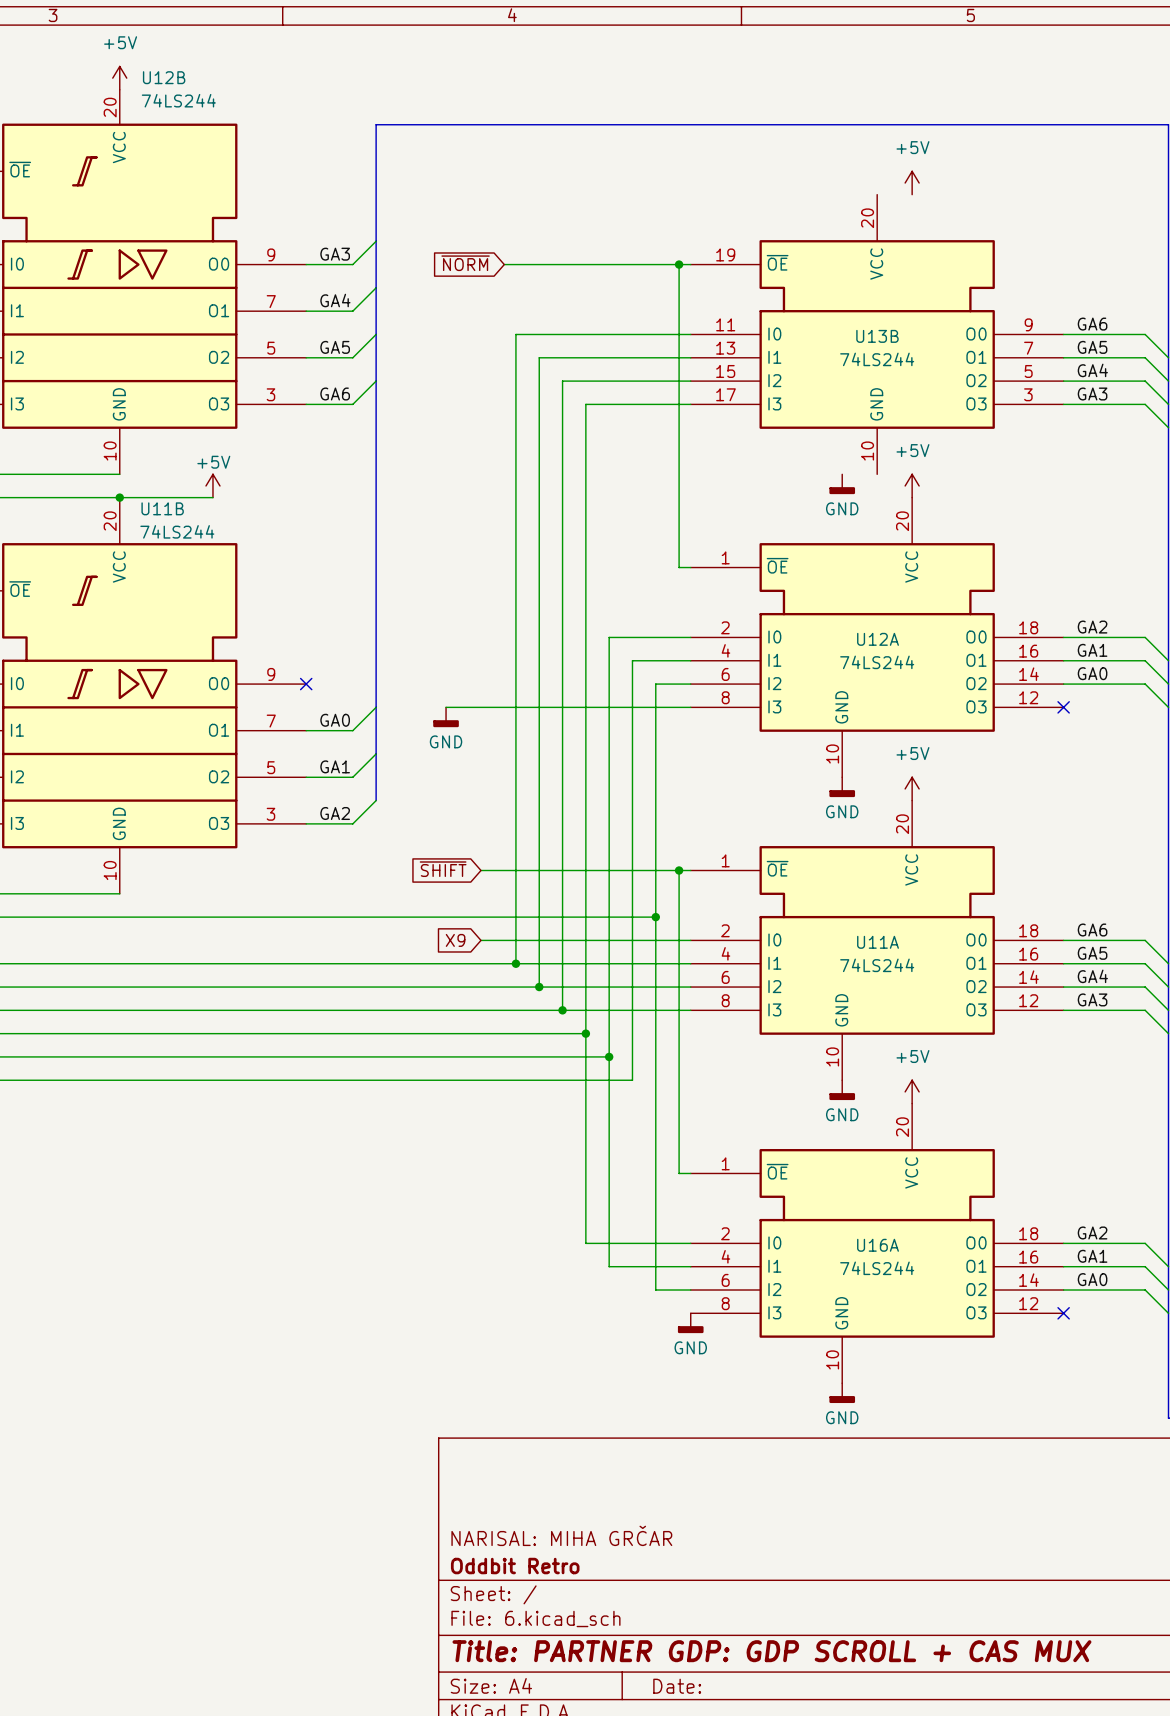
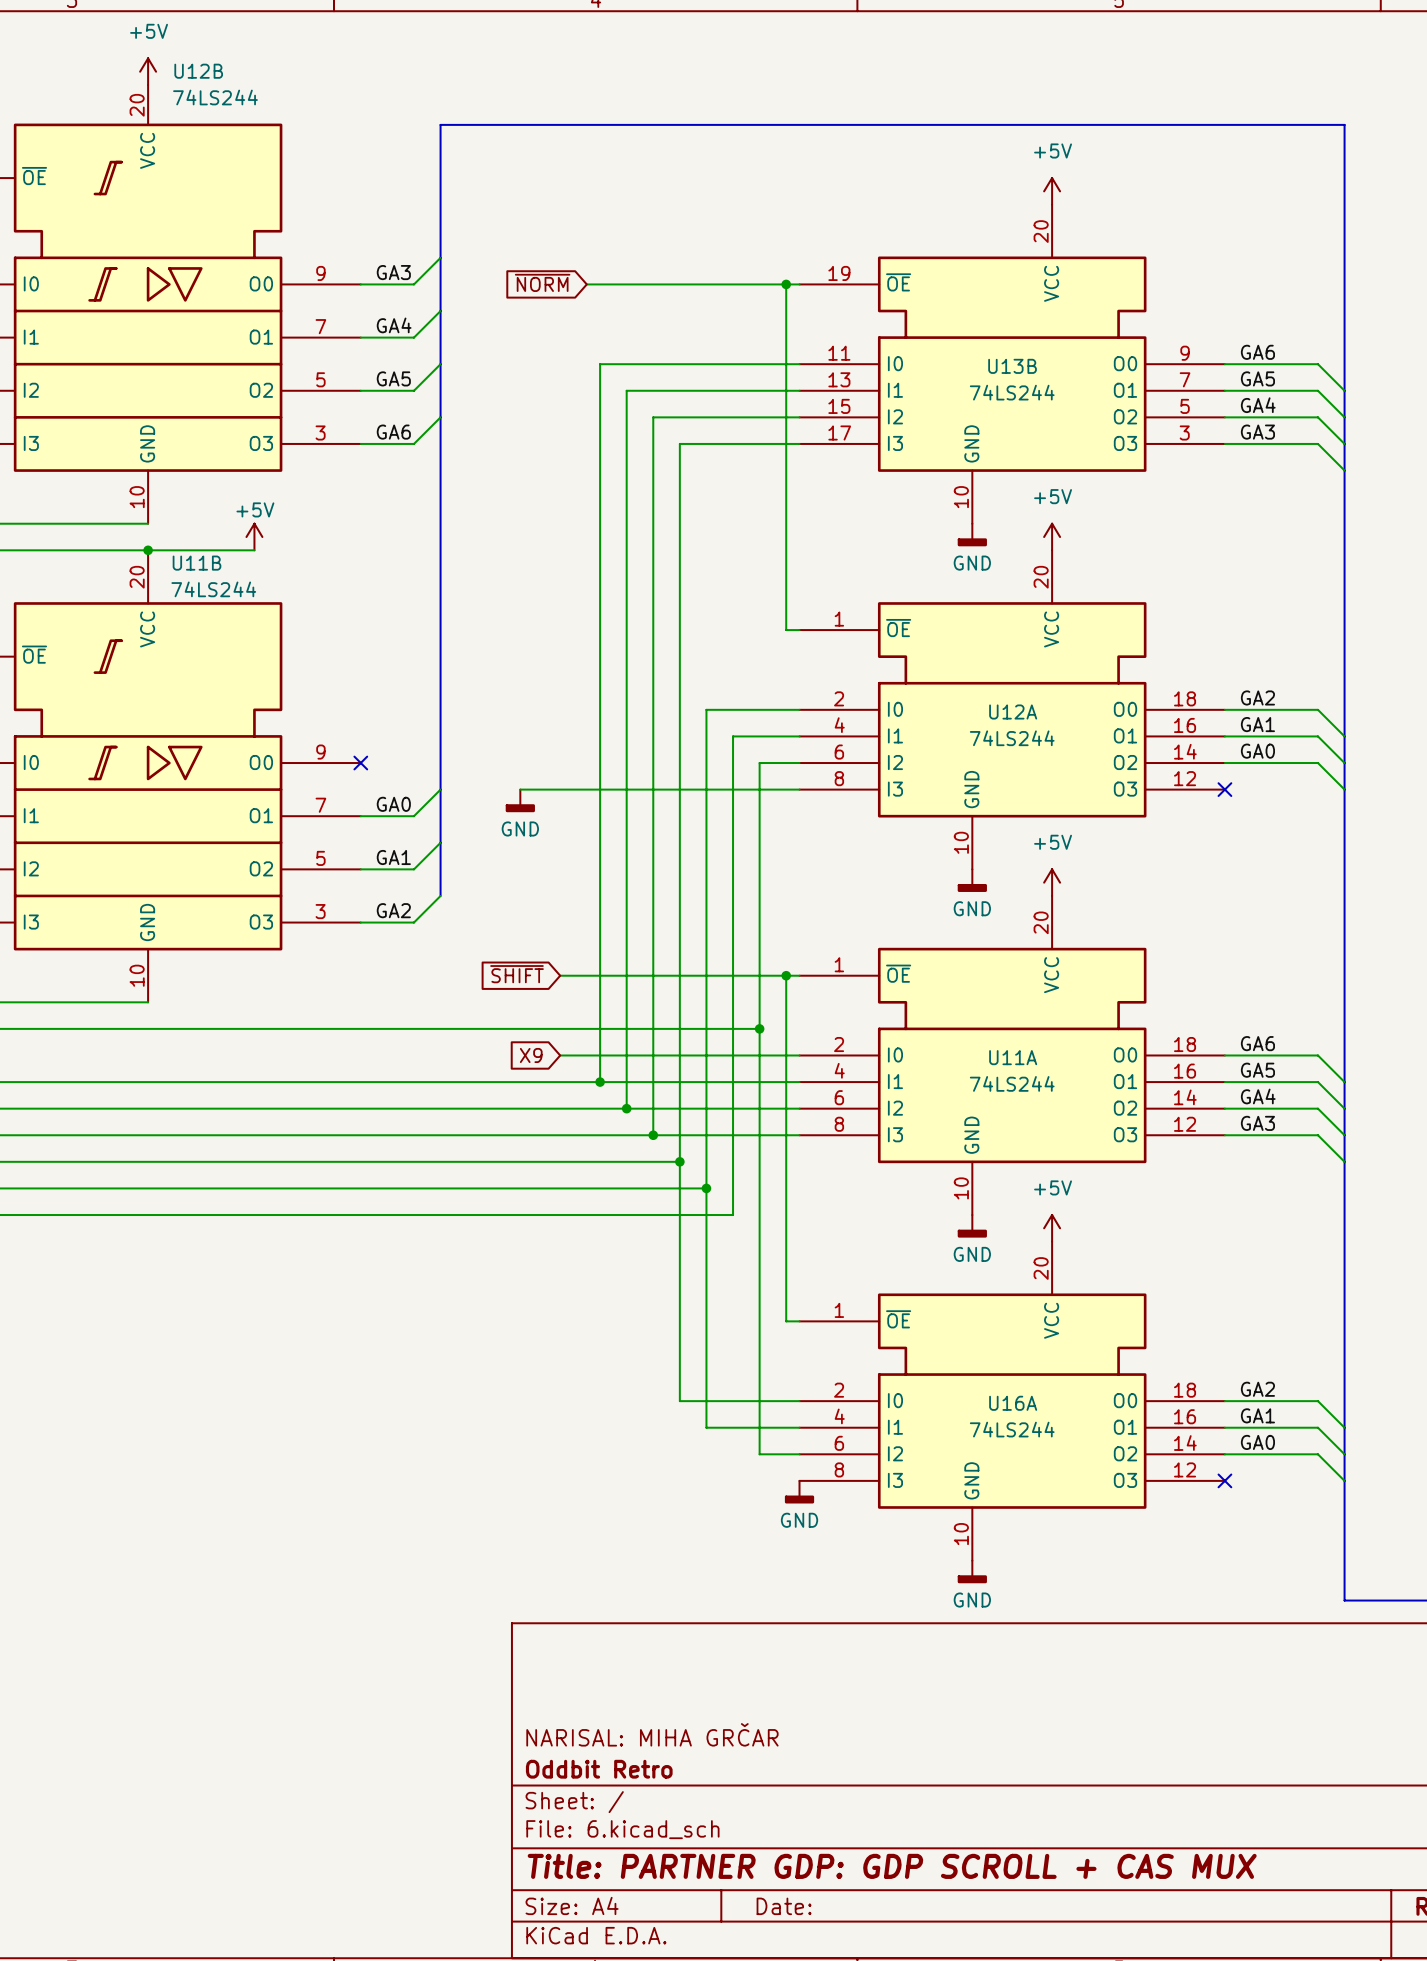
U13B symbol: [690, 194, 1064, 475] -> [799, 204, 1225, 524]

